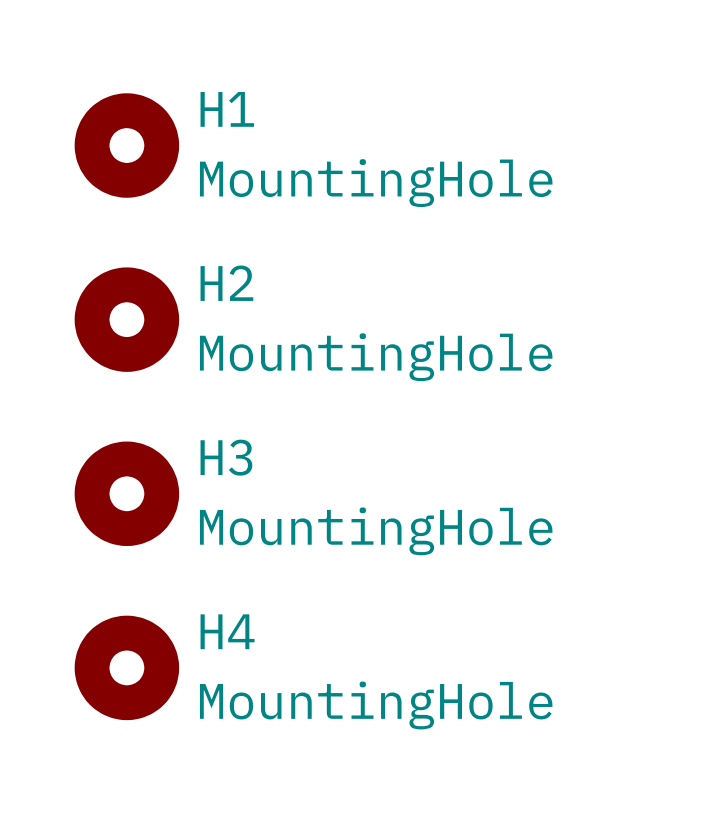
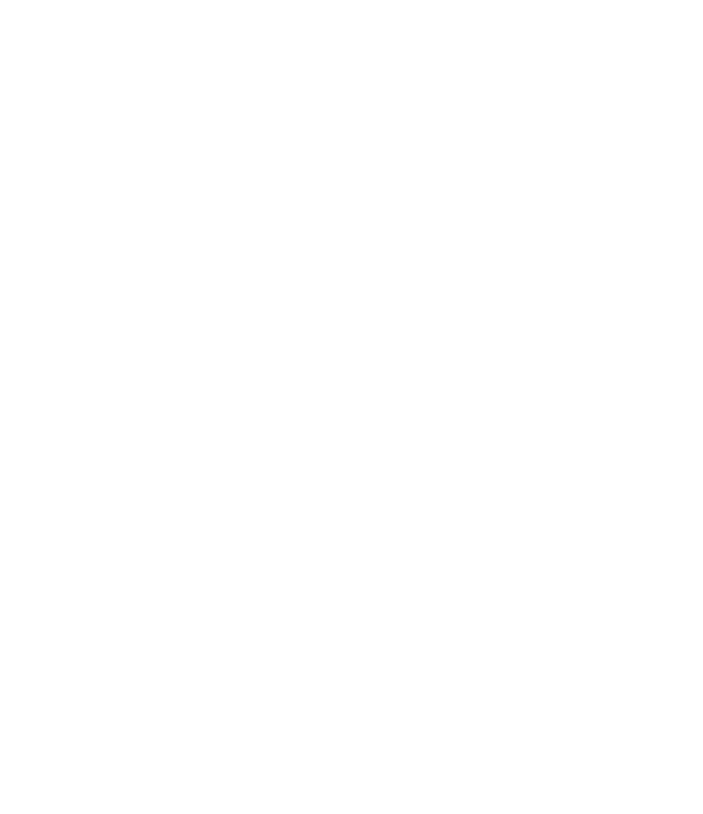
H1: MountingHole (126, 145) -> none
H2: MountingHole (126, 319) -> none
H3: MountingHole (126, 493) -> none
H4: MountingHole (126, 667) -> none

